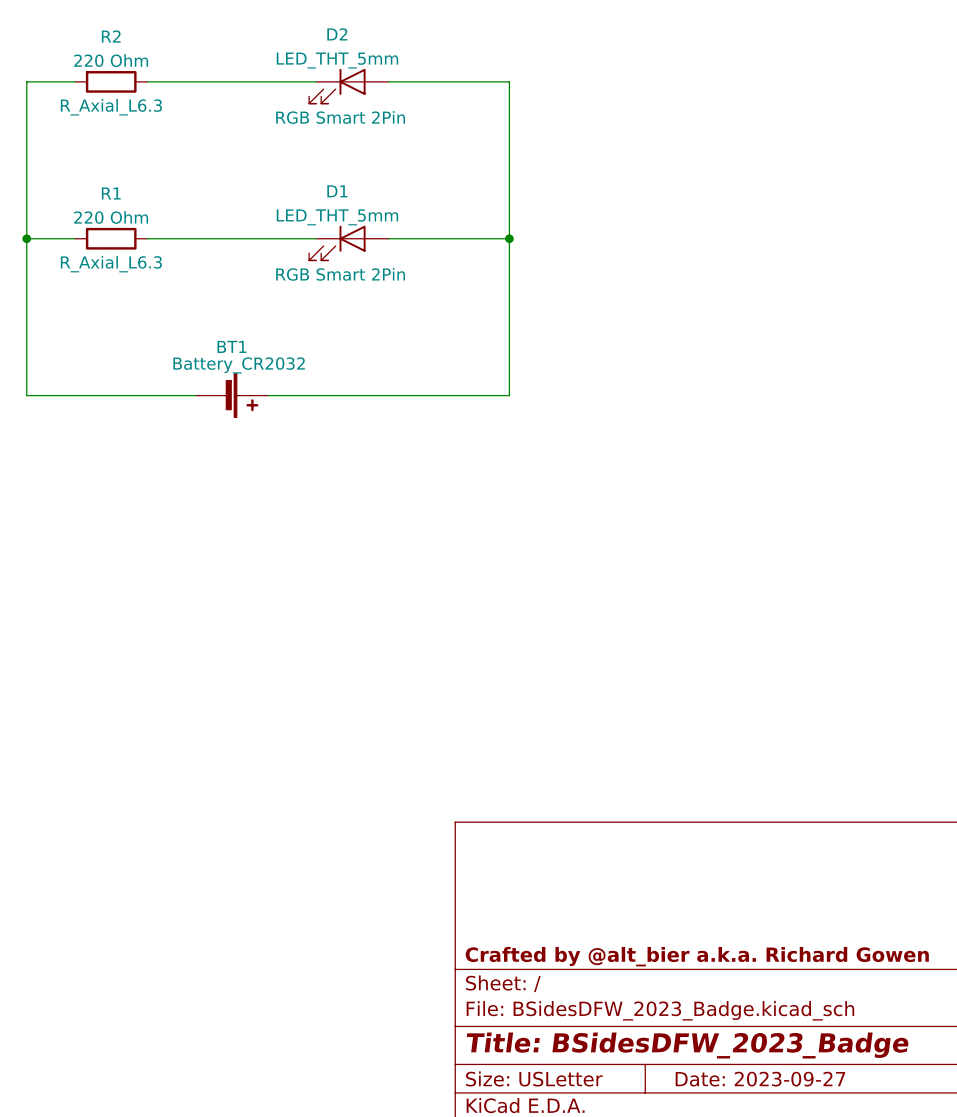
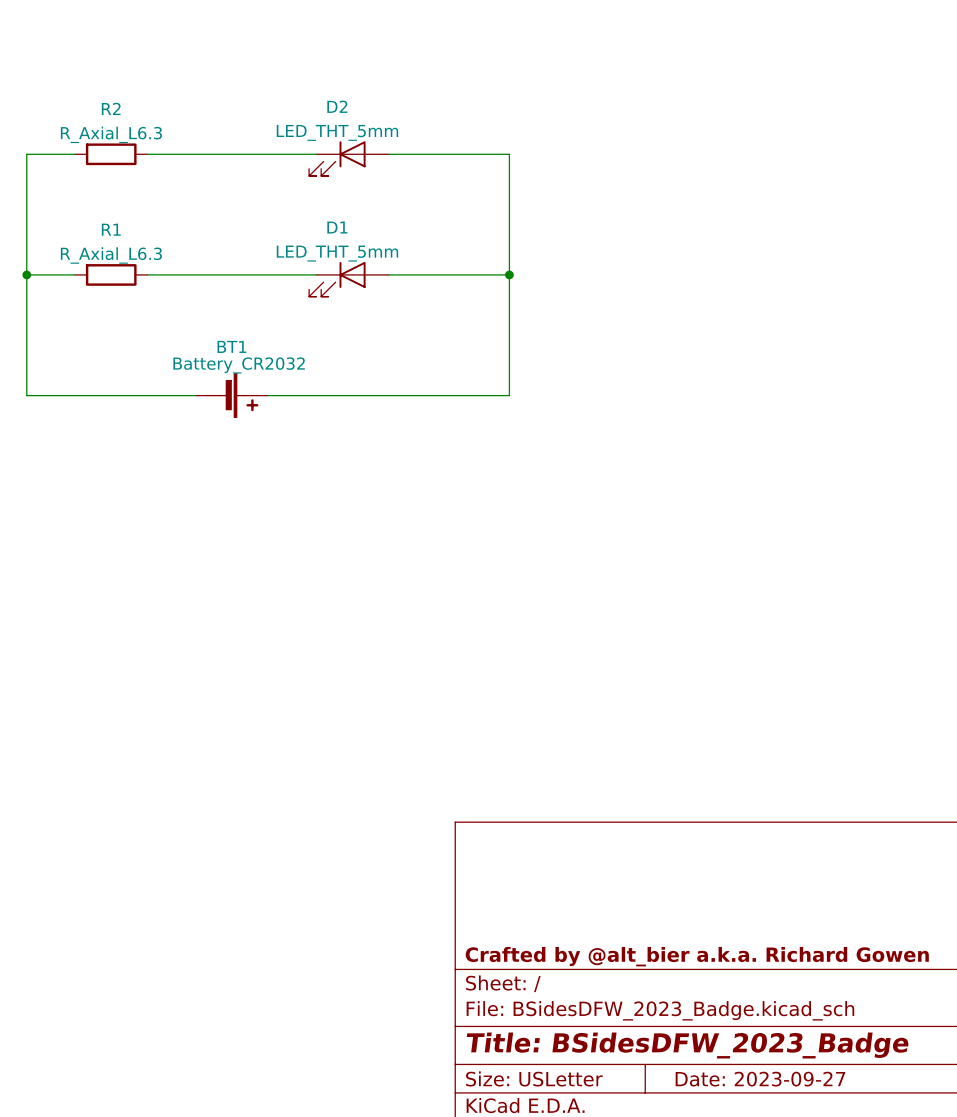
R2 value: 220 Ohm (111, 60) -> R_Axial_L6.3 (111, 134)
wire: (75, 81) (26, 81) (26, 154) -> (75, 154) (26, 154)
R2 position: (111, 81) -> (111, 154)
wire: (147, 81) (316, 81) -> (147, 154) (316, 154)
wire: (388, 81) (509, 81) (509, 154) -> (388, 154) (509, 154)
D2 position: (348, 86) -> (348, 158)
R2 text: R_Axial_L6.3 (111, 107) -> none
D2 text: RGB Smart 2Pin (340, 117) -> none
R1 value: 220 Ohm (111, 217) -> R_Axial_L6.3 (111, 255)
wire: (26, 238) (75, 238) -> (26, 274) (75, 274)
junction position: (26, 238) -> (26, 274)
R1 position: (111, 238) -> (111, 274)
wire: (147, 238) (316, 238) -> (147, 274) (316, 274)
wire: (388, 238) (509, 238) -> (388, 274) (509, 274)
junction position: (509, 238) -> (509, 274)
D1 position: (348, 243) -> (348, 279)
R1 text: R_Axial_L6.3 (111, 264) -> none
D1 text: RGB Smart 2Pin (340, 274) -> none

